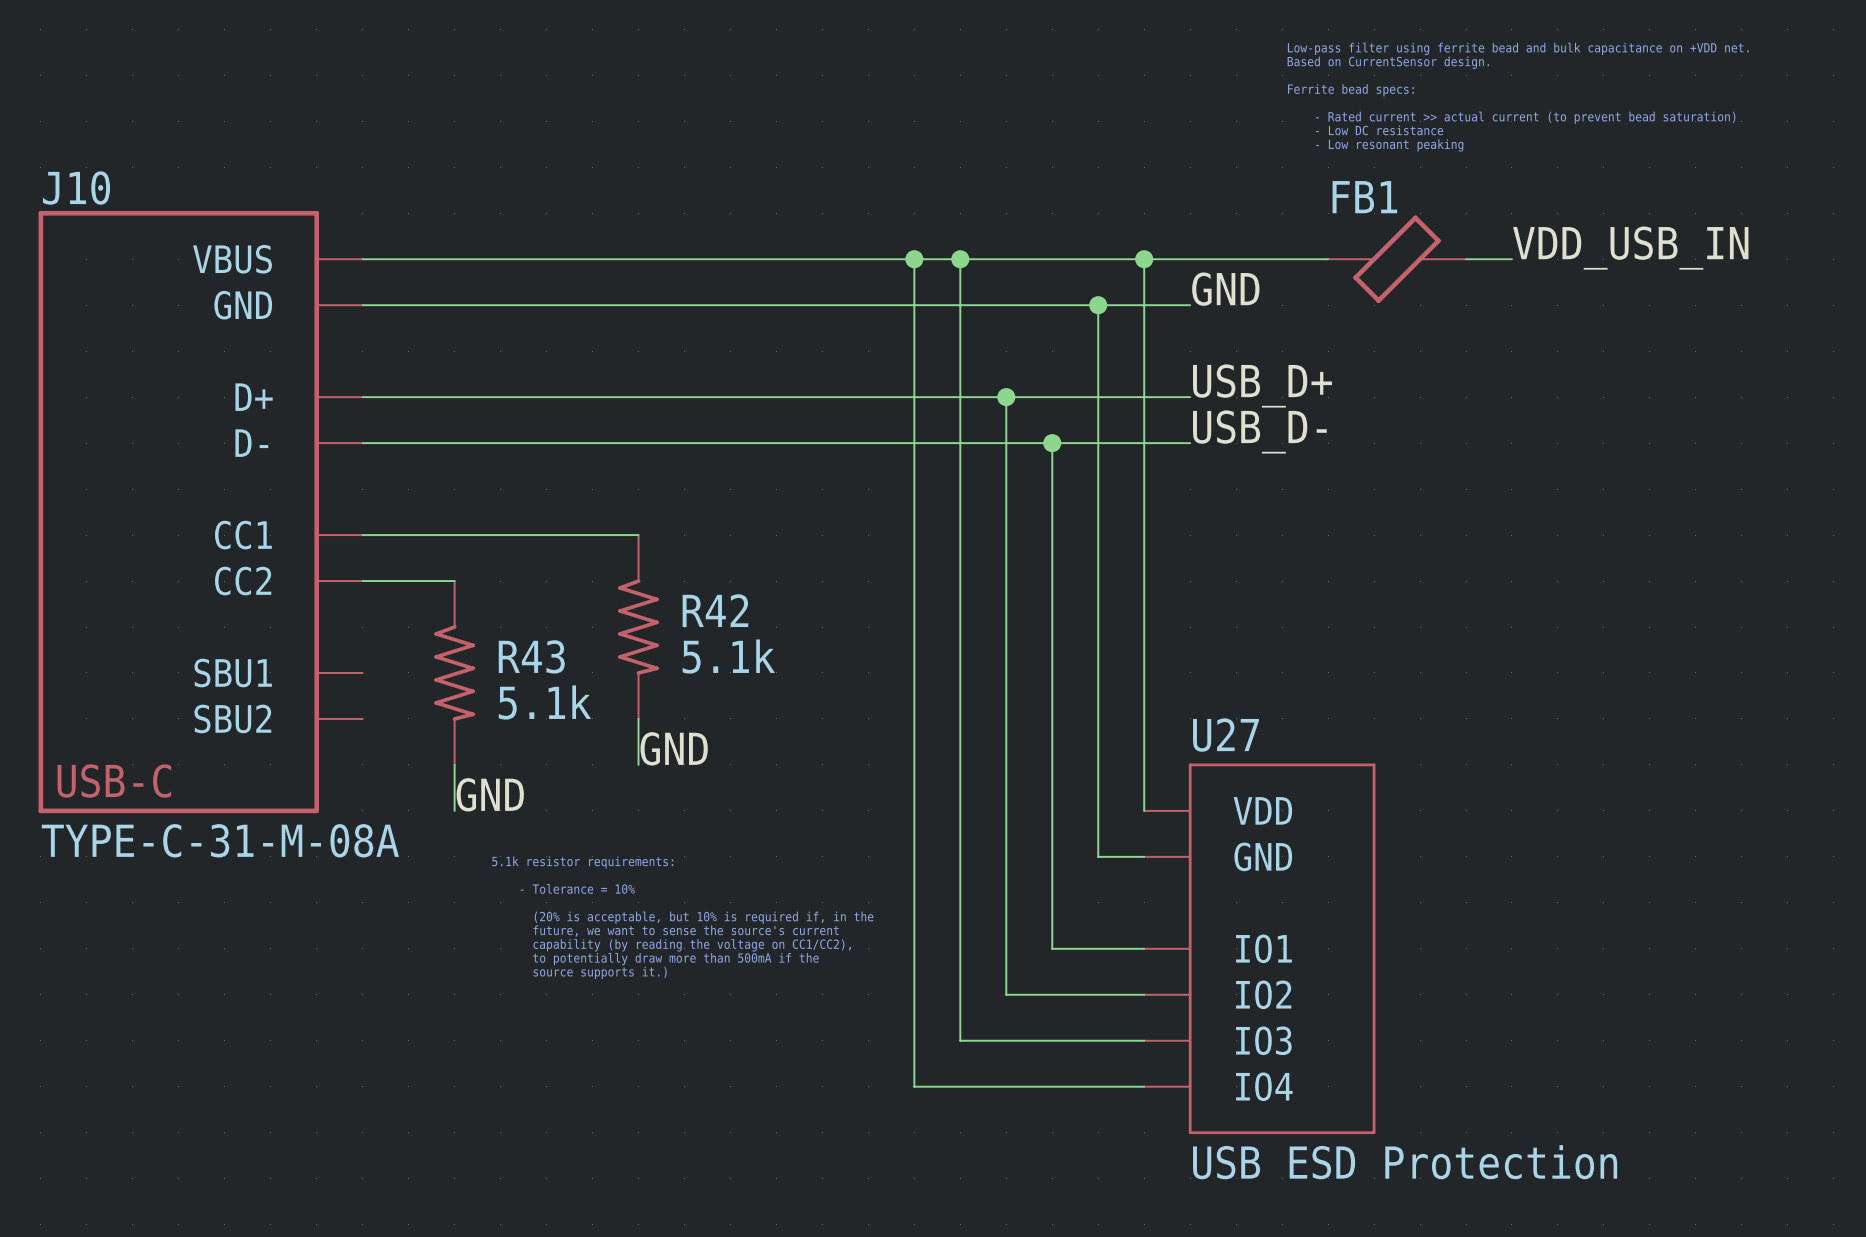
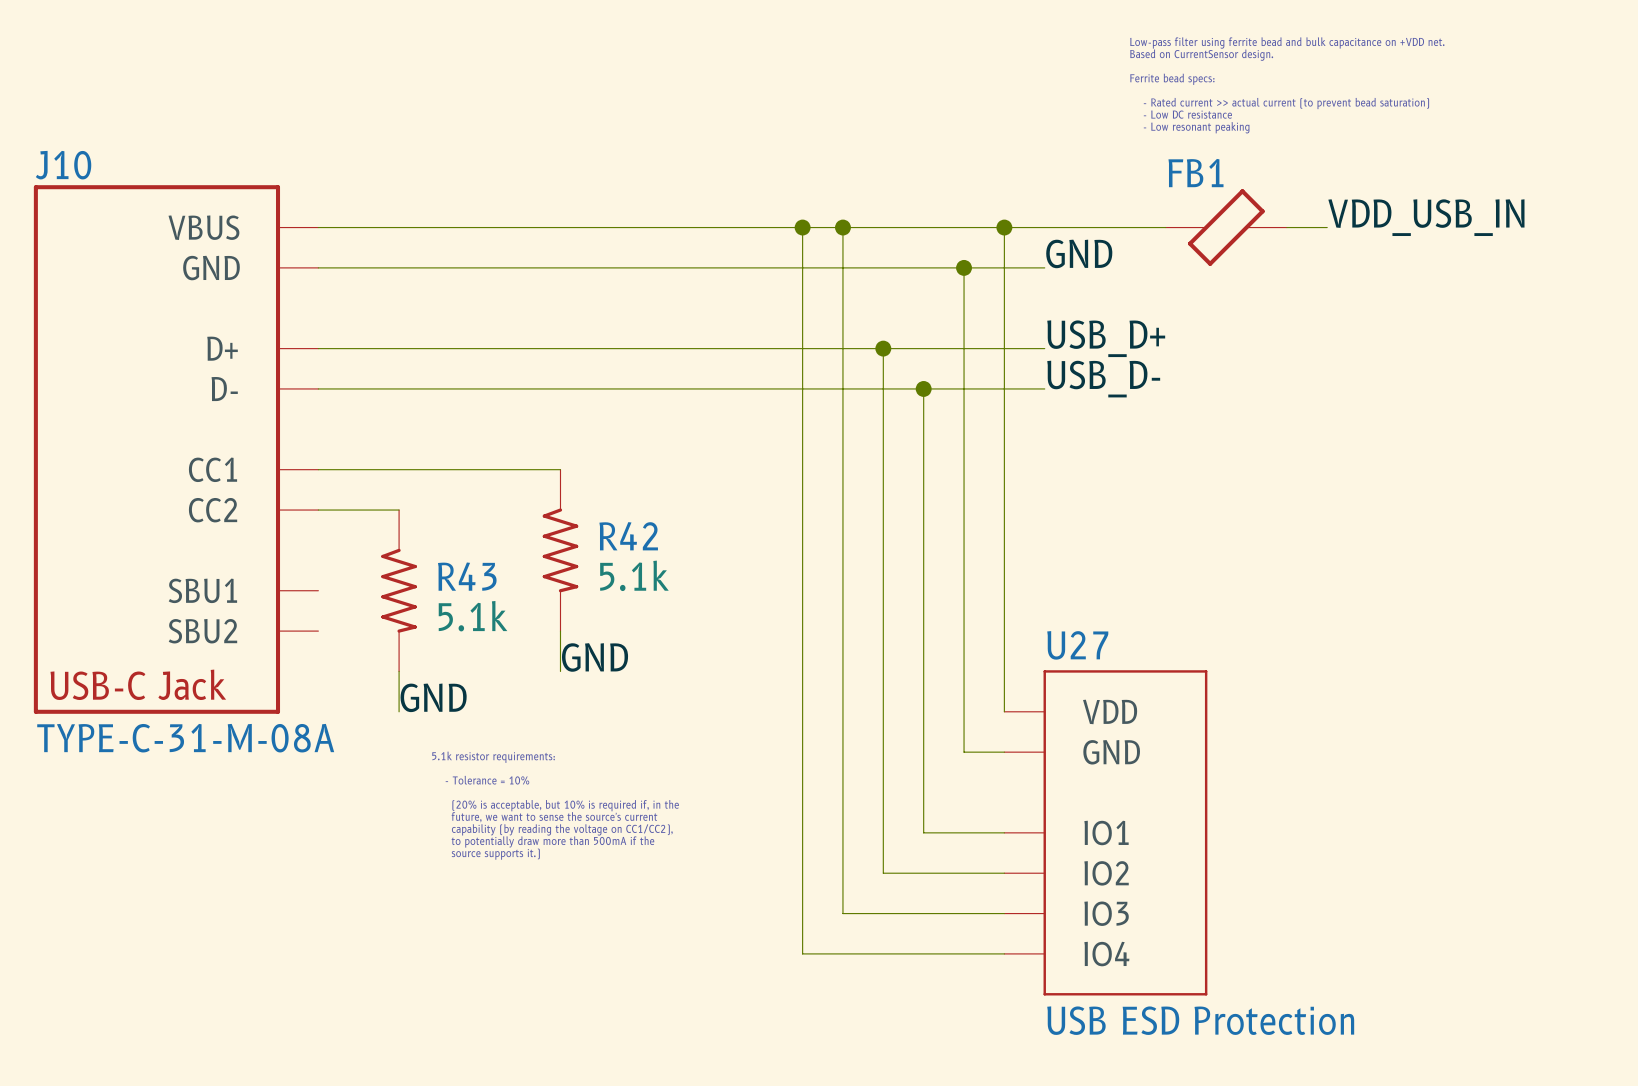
J10 text: USB-C (114, 781) -> USB-C Jack (138, 684)

